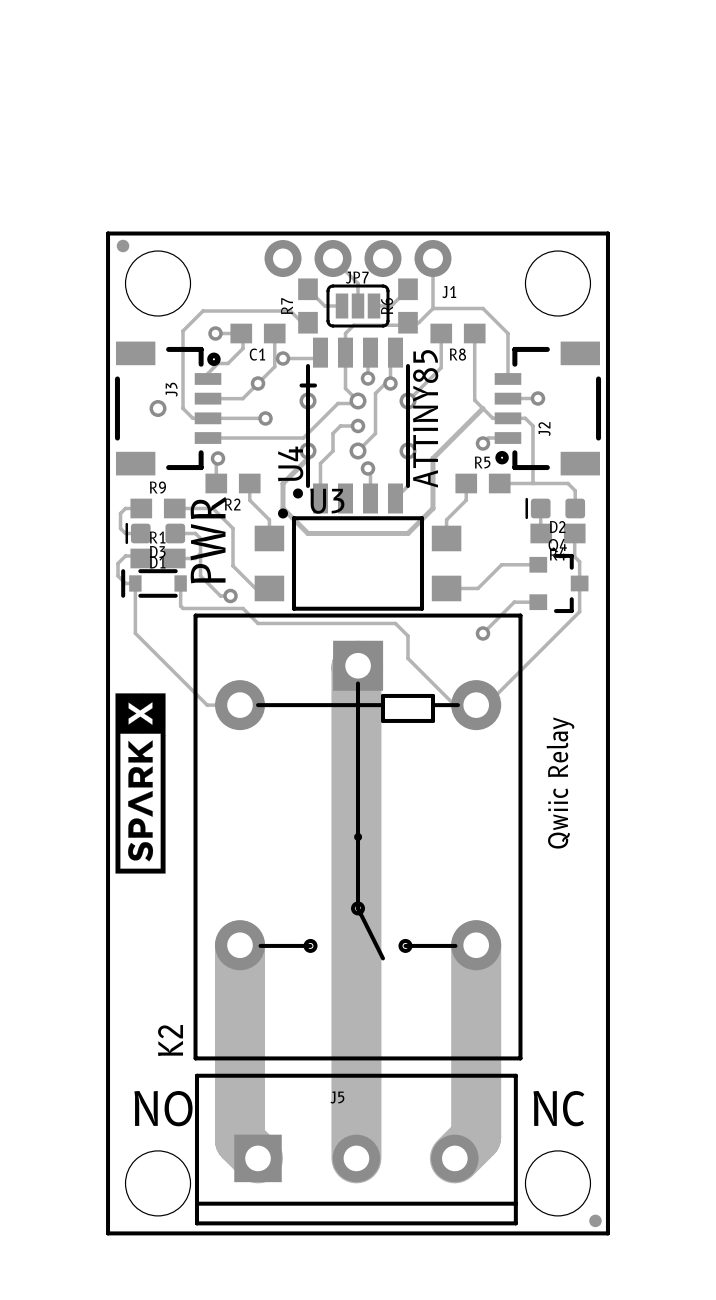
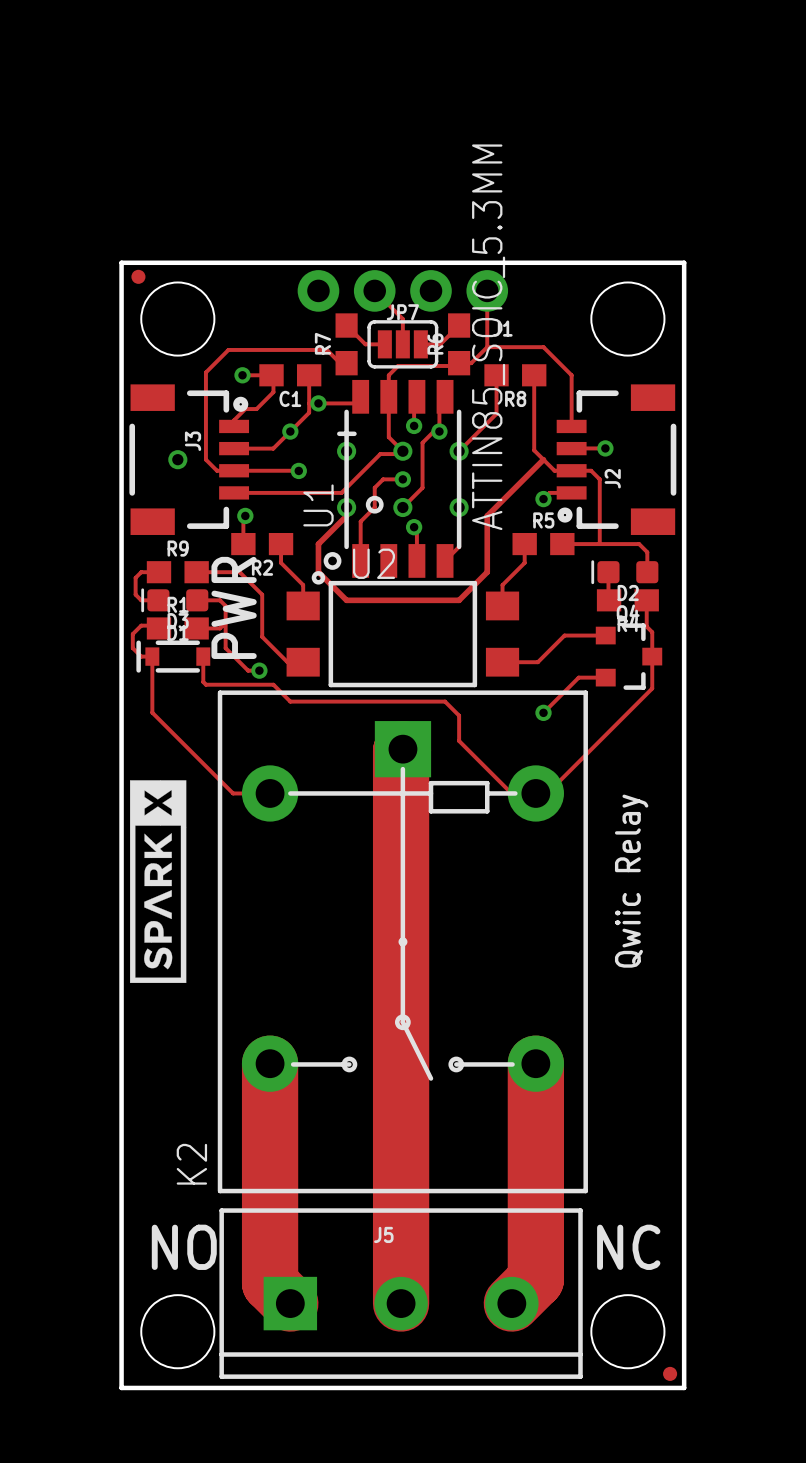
U1: none -> ATTIN85_SOIC_5.3MM (392, 478)
U4: ATTINY85 (351, 425) -> none
U3: (358, 559) -> none
U2: none -> (402, 629)

